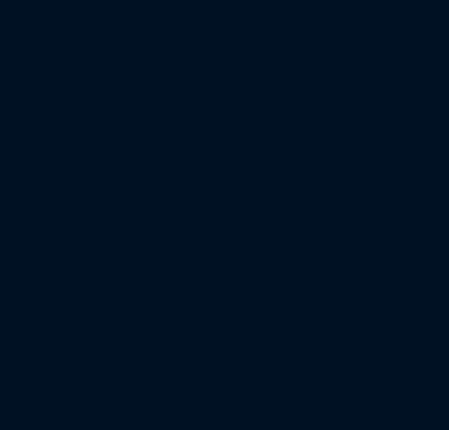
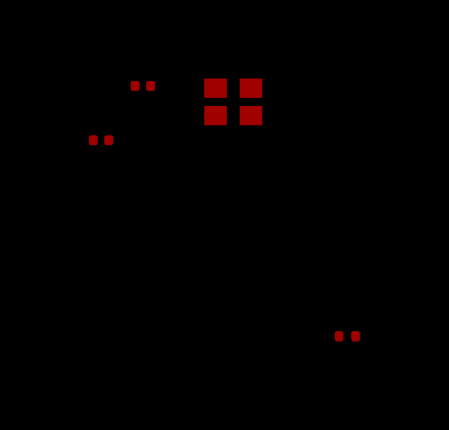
part: none -> (142, 85)
part: none -> (233, 101)
part: none -> (101, 140)
part: none -> (347, 336)

